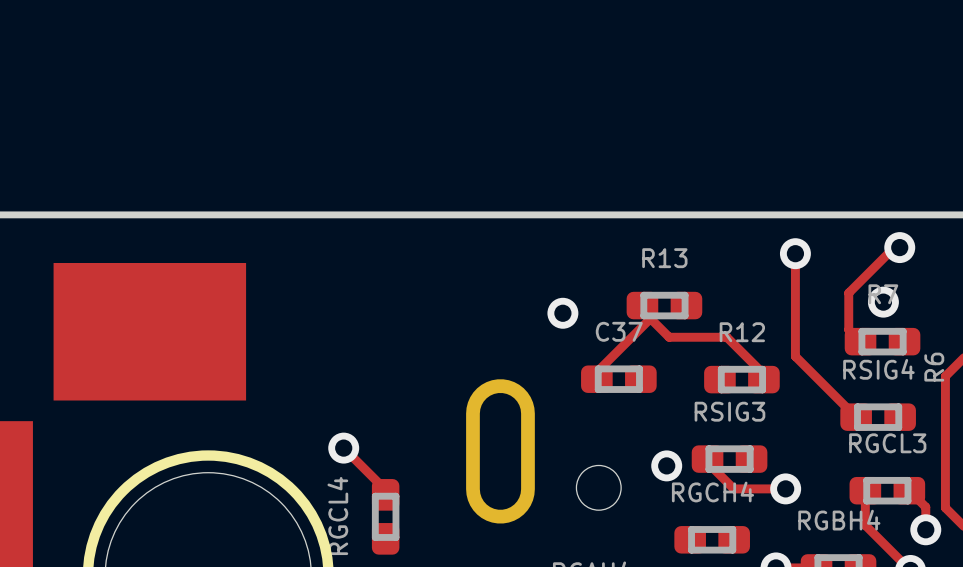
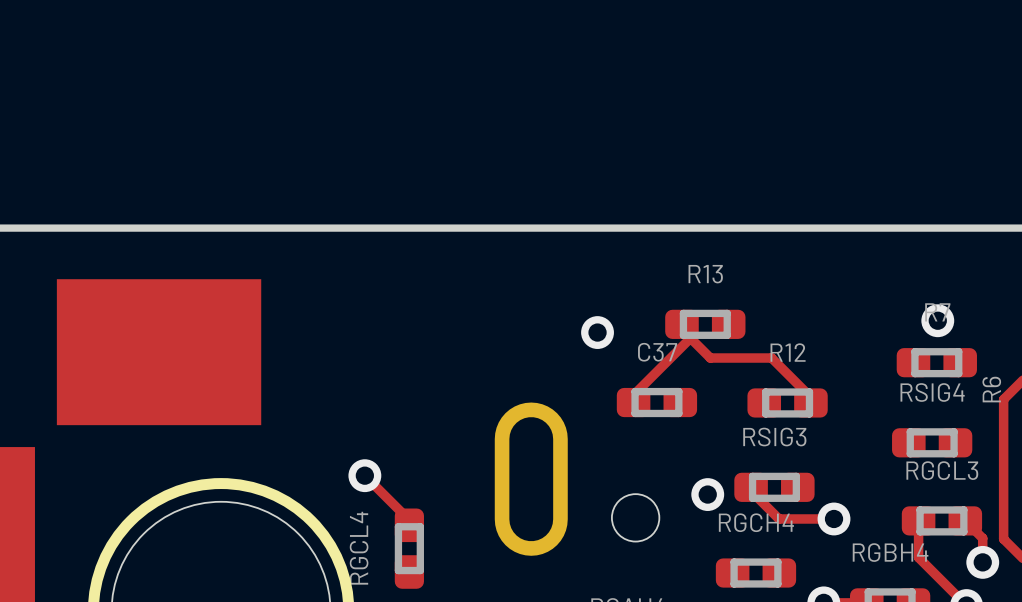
track: (899, 247) (894, 247) (848, 293) (848, 329) (860, 341) -> none
via: (899, 247) -> none
track: (795, 253) (795, 356) (856, 417) -> none
via: (795, 253) -> none

